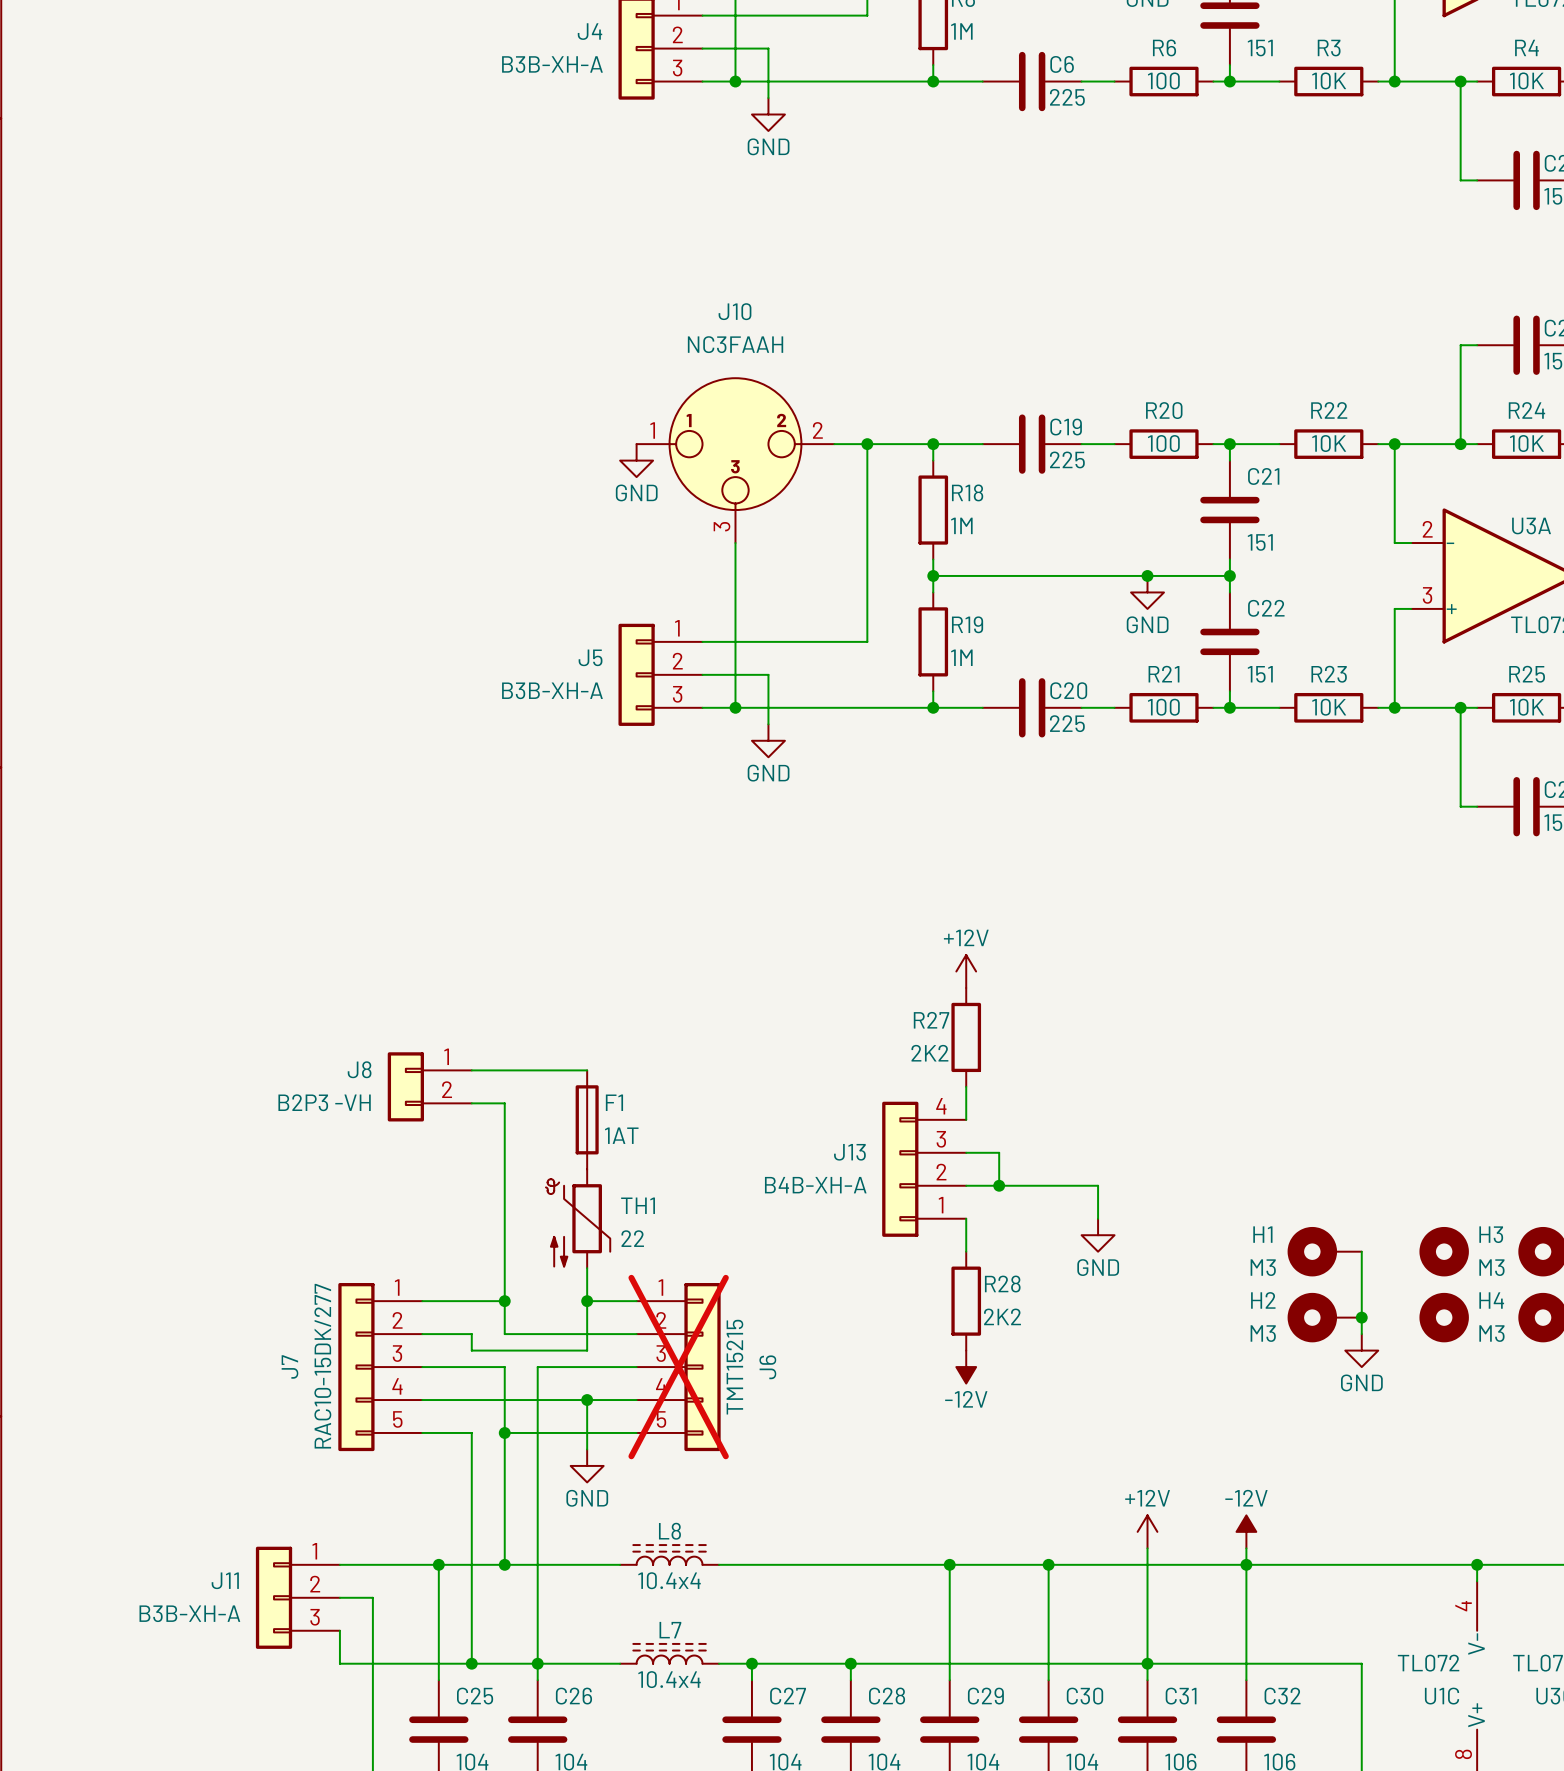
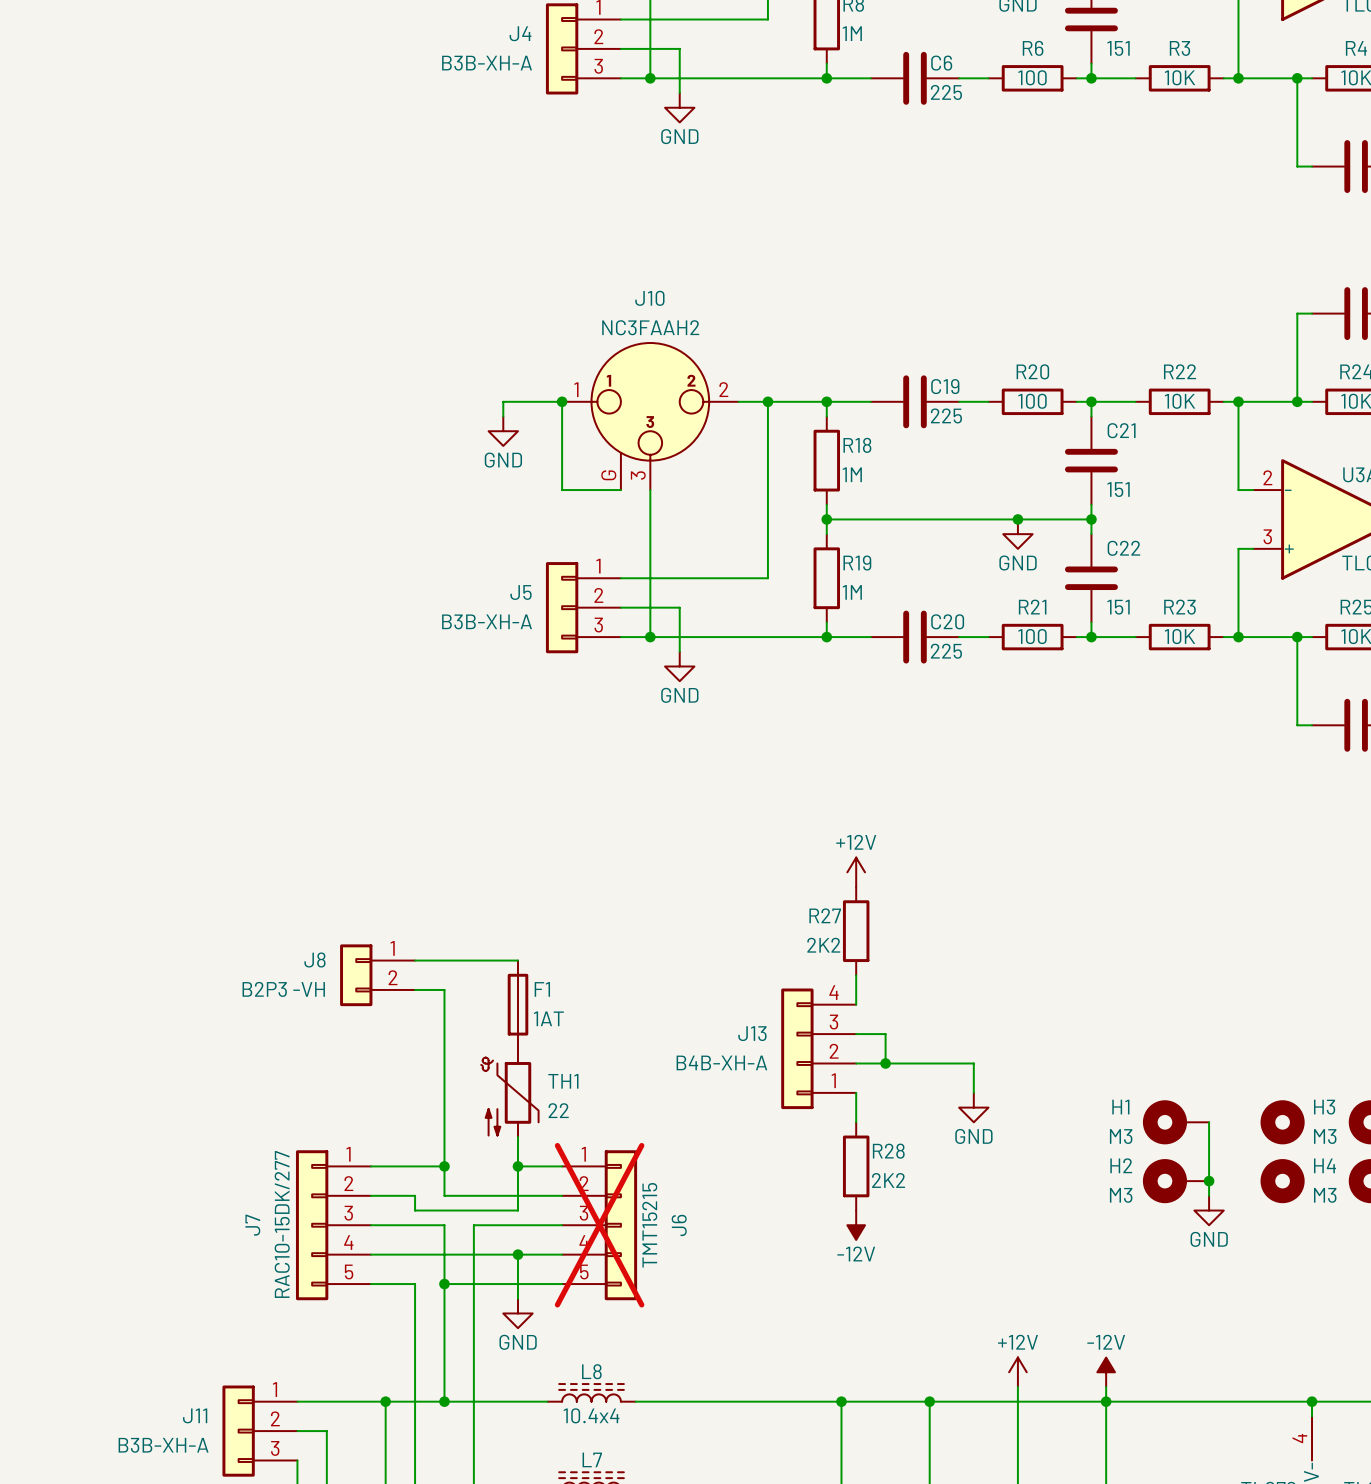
J10 value: NC3FAAH (735, 344) -> NC3FAAH2 (650, 327)
J10 symbol: [636, 378, 835, 544] -> [562, 343, 739, 491]
junction: none -> (562, 401)
wire: none -> (503, 416) (503, 401) (562, 401) (562, 490) (620, 490)
power symbol position: GND (636, 460) -> GND (503, 431)

